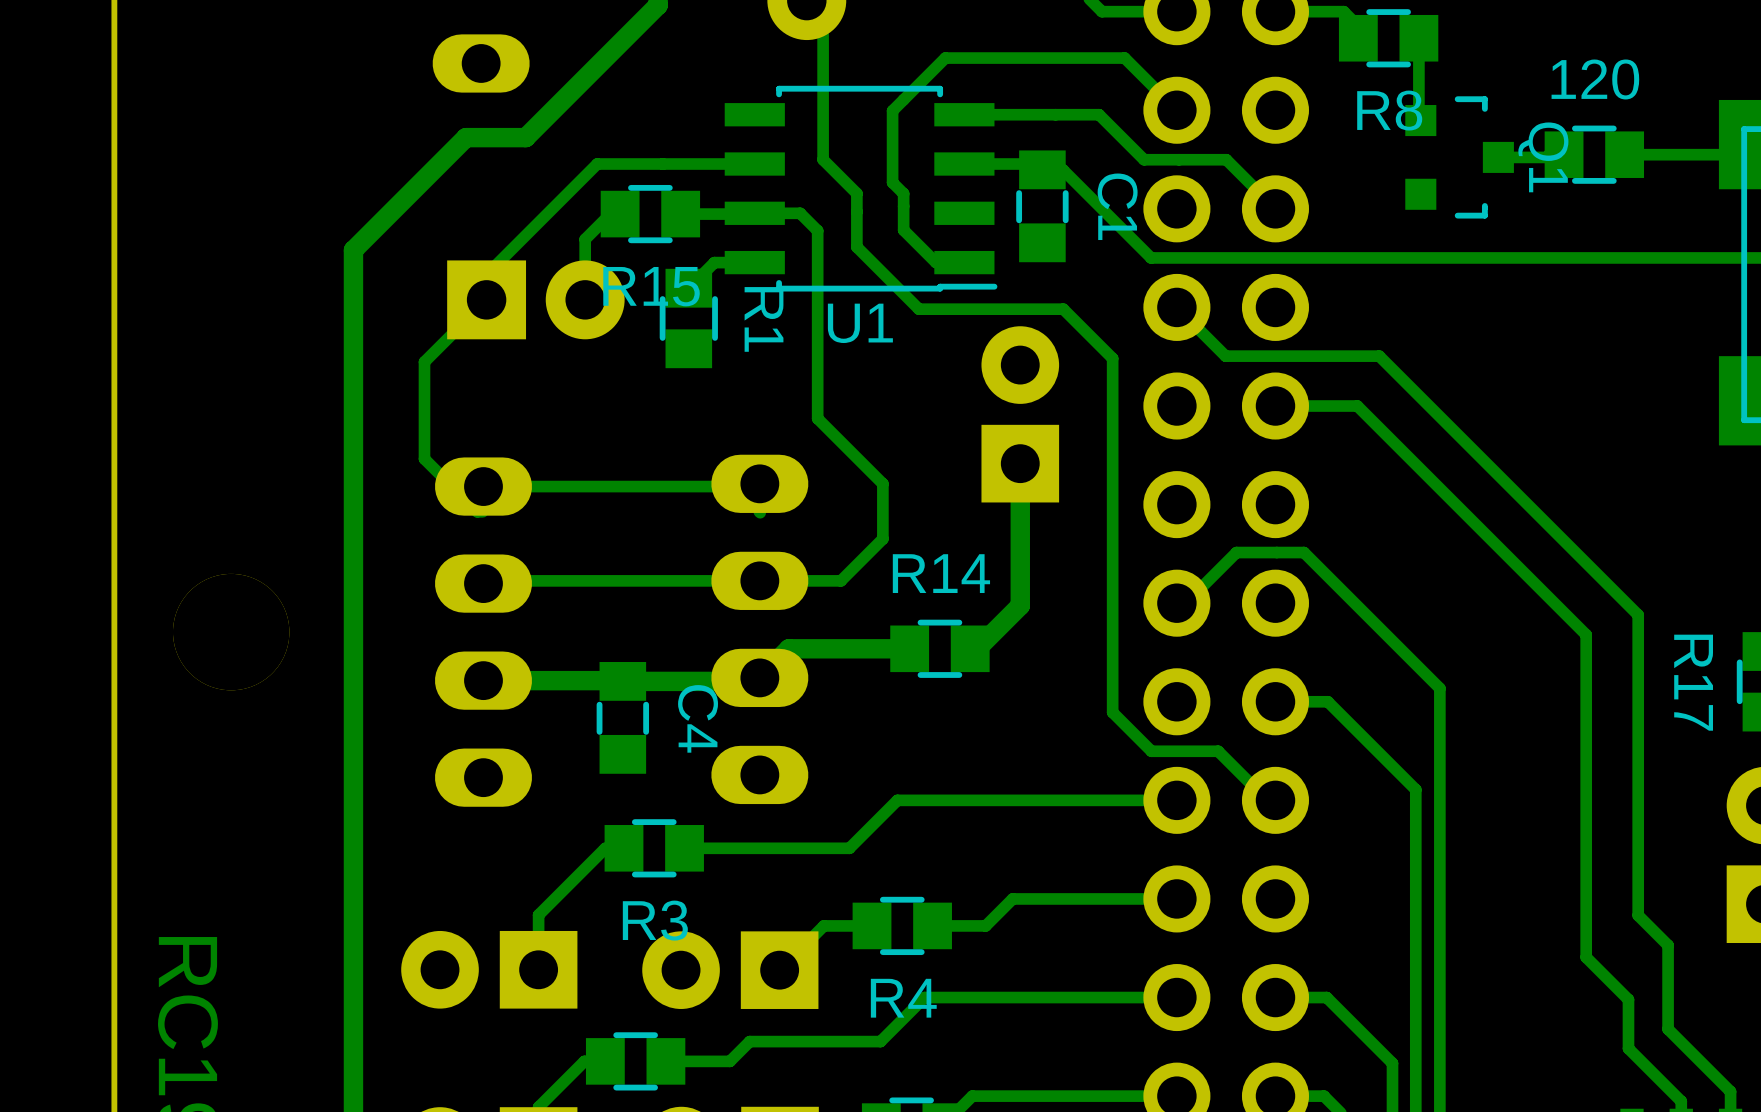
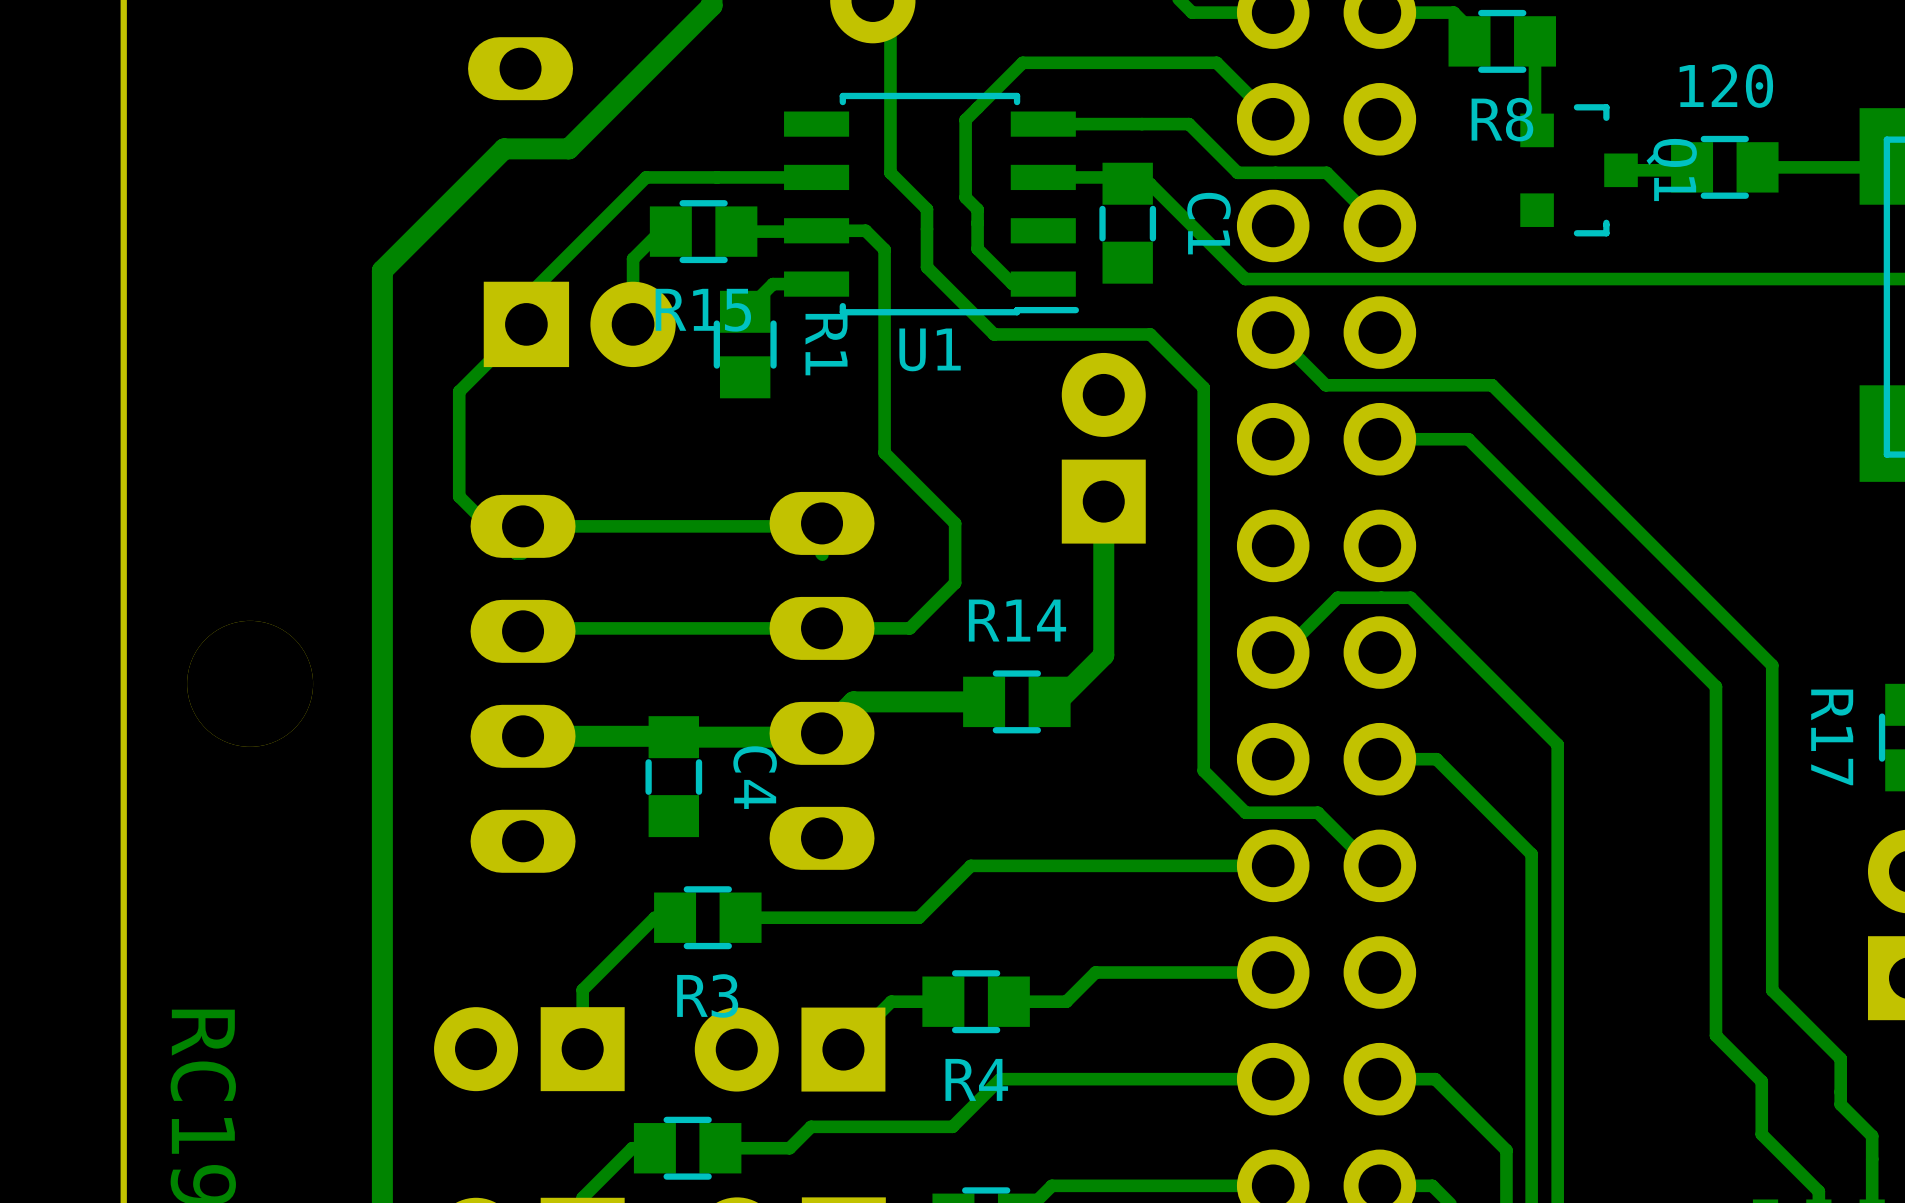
bottom track: (1668, 945) (1668, 1029) (1730, 1091) -> (1804, 1022) (1840, 1058) (1840, 1104) (1872, 1136) (1872, 1180)

